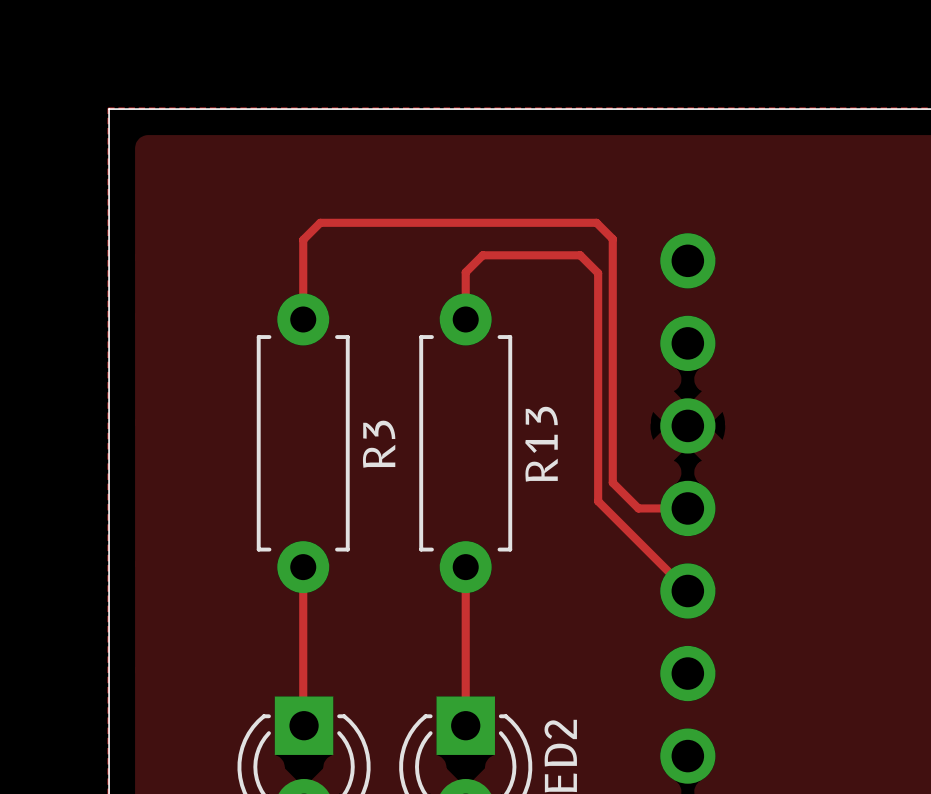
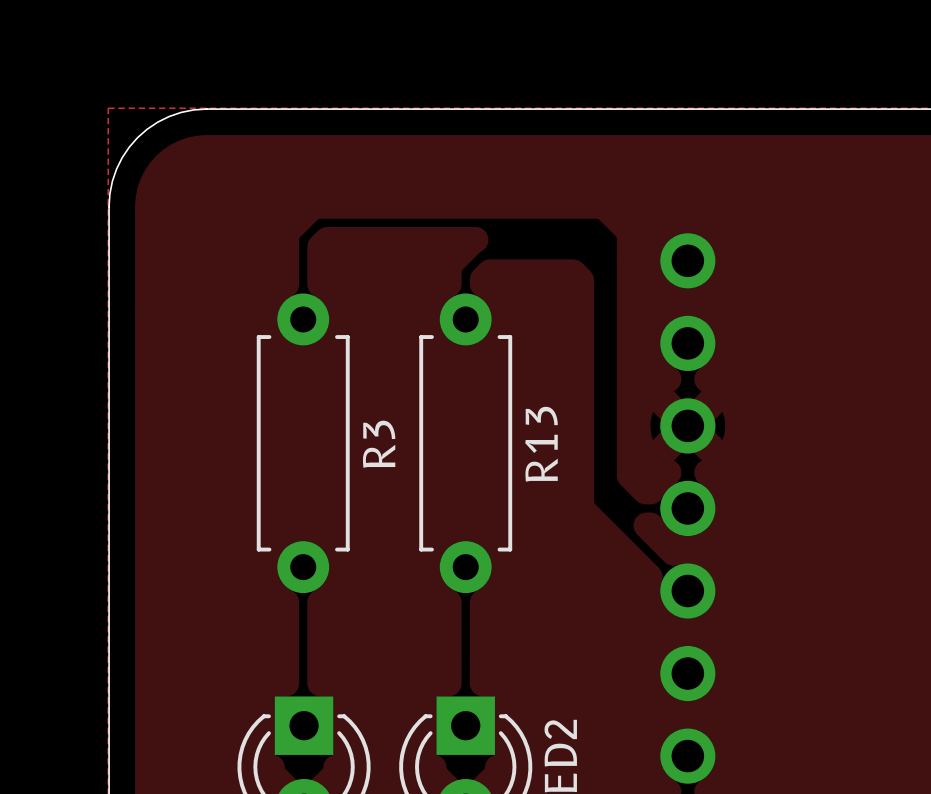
board edge: (206, 109) (109, 109) (109, 206) -> (206, 109) (193, 109) (169, 116) (157, 122) (137, 137) (129, 147) (116, 169) (109, 193) (109, 206)
top track: (303, 319) (303, 239) (320, 222) (596, 222) (612, 239) (612, 482) (638, 508) (687, 508) -> none
top track: (465, 319) (465, 272) (482, 255) (580, 255) (598, 273) (598, 501) (687, 591) -> none
top track: (303, 567) (304, 725) -> none
top track: (465, 567) (465, 725) -> none

